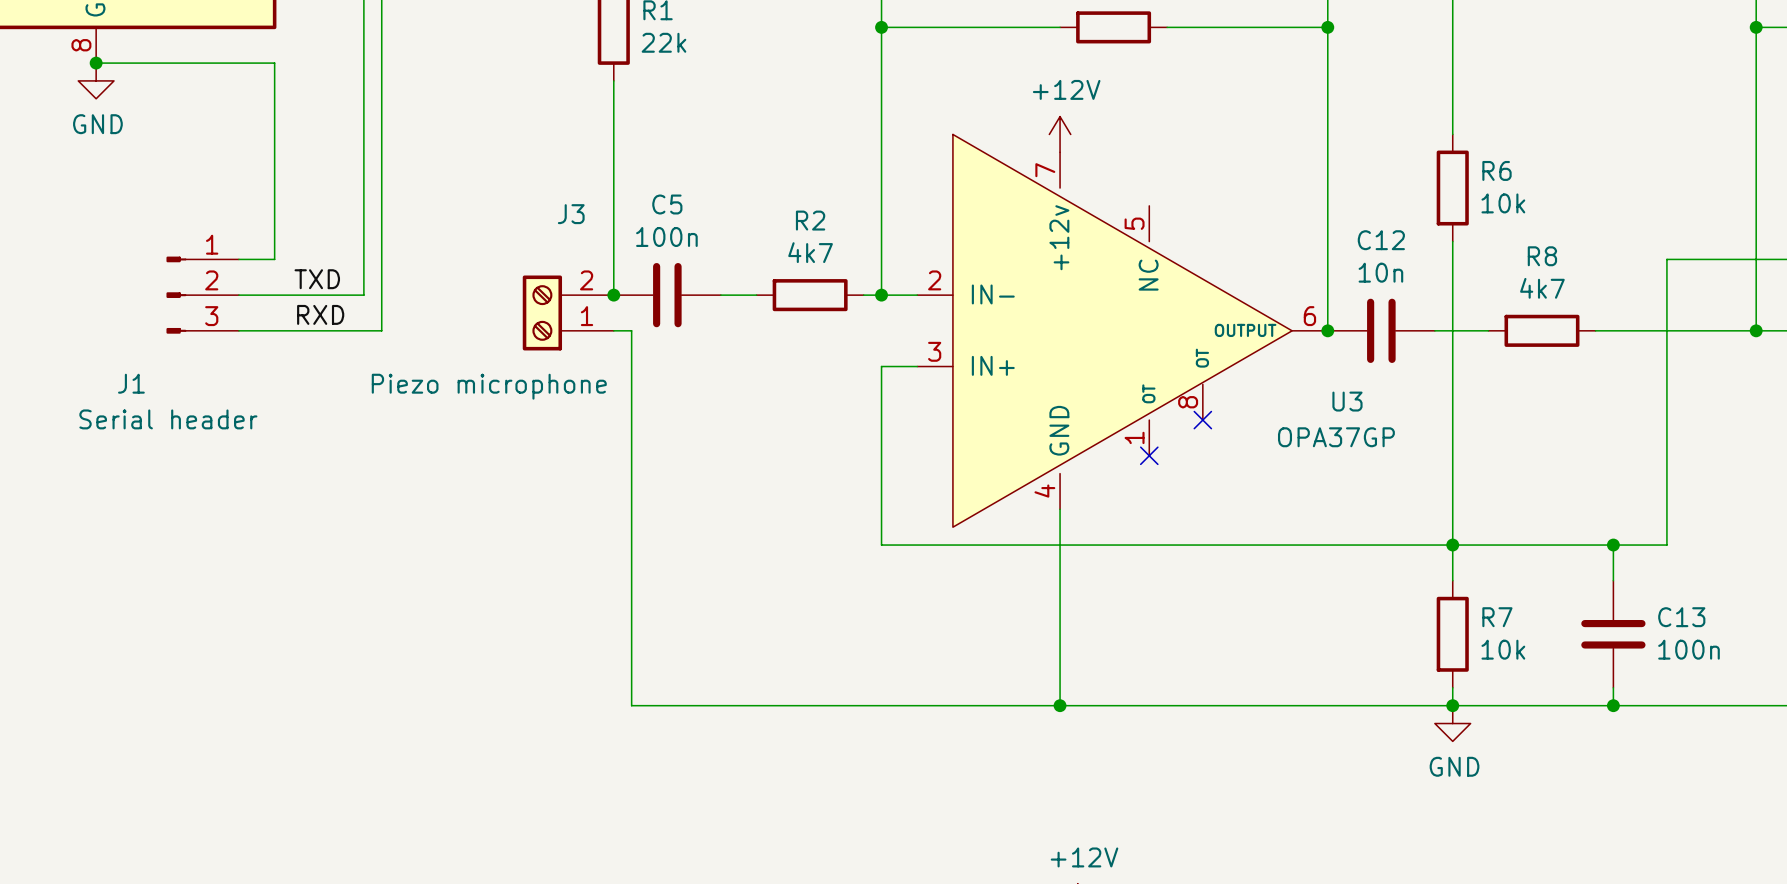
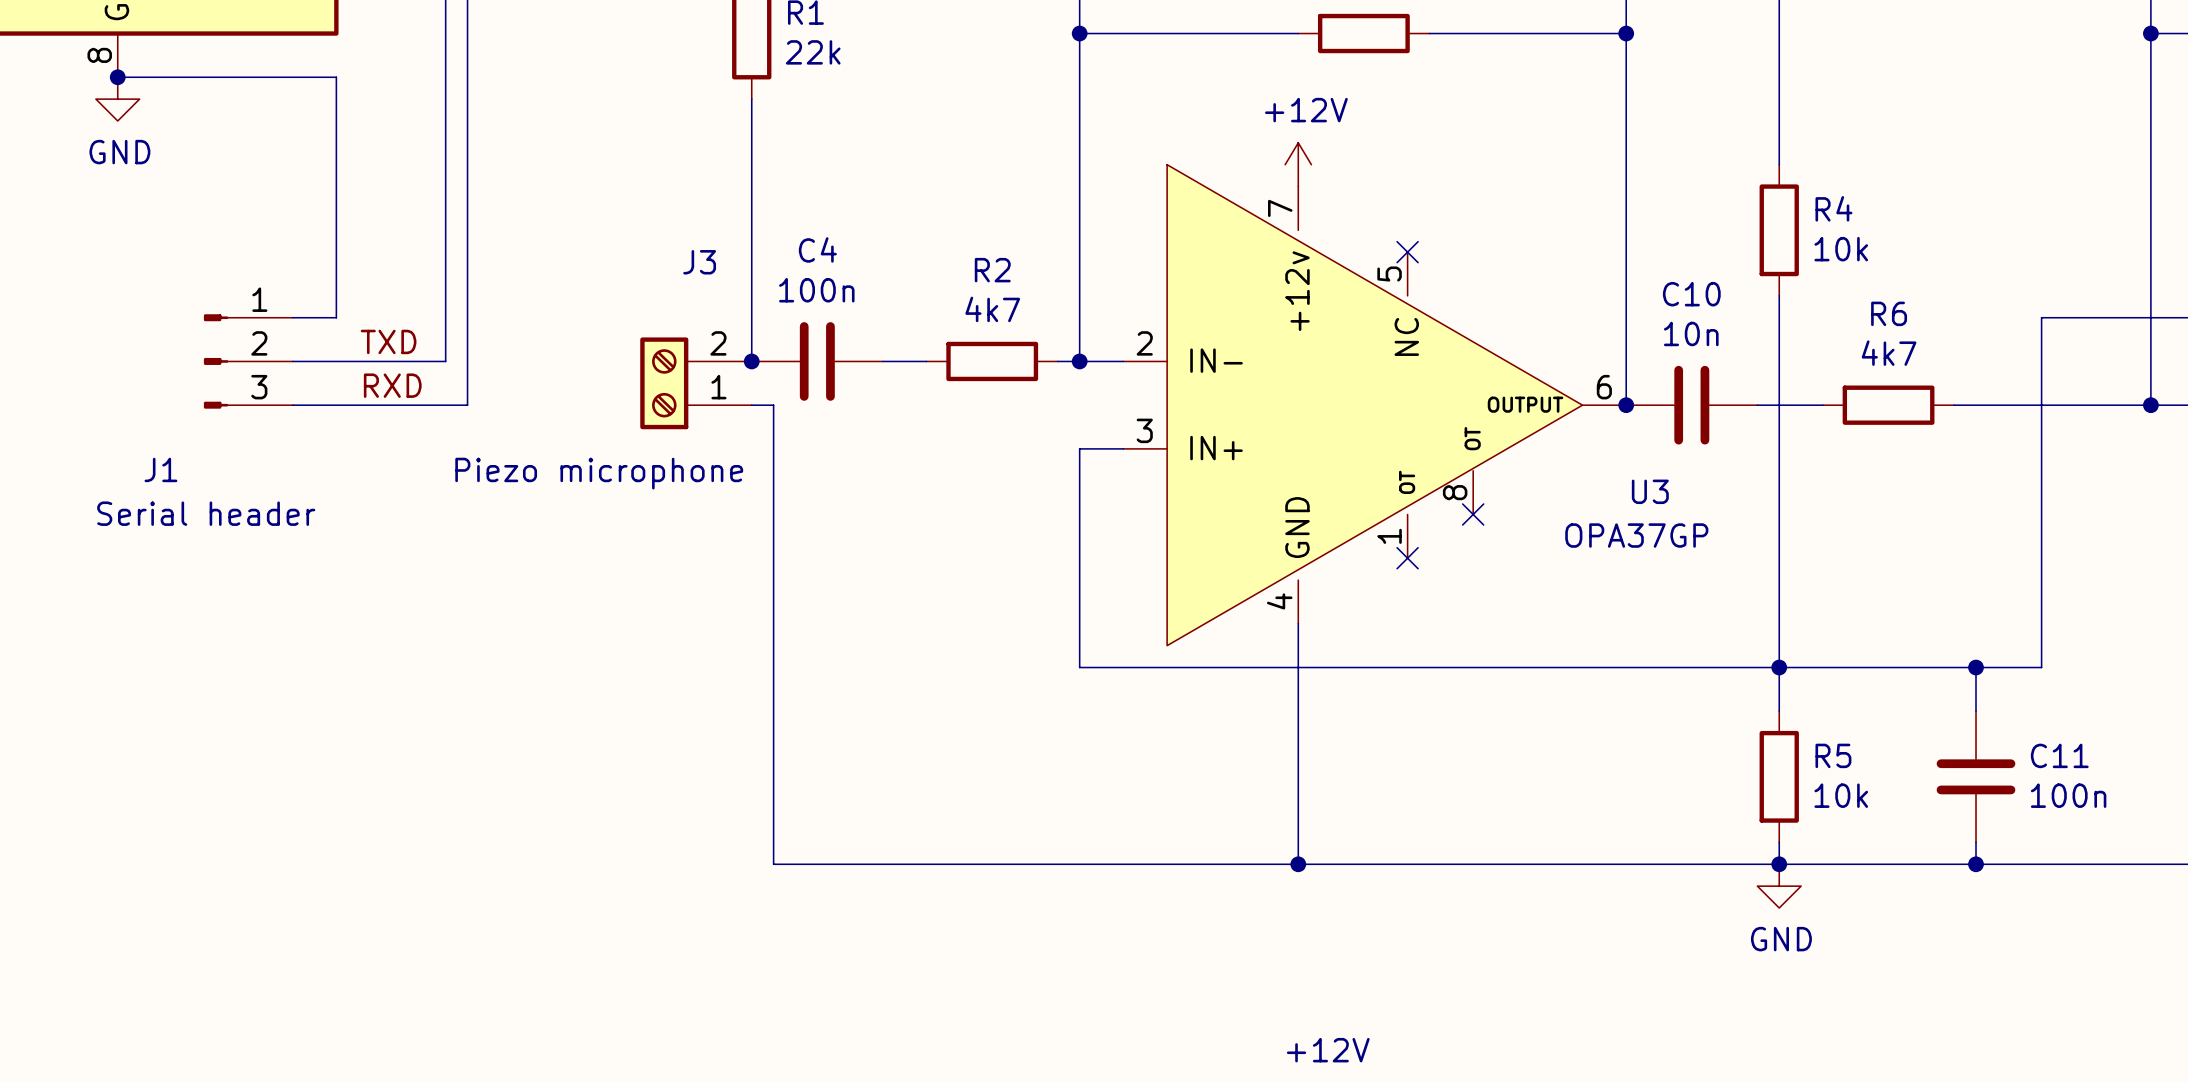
R6 name: R6 (1496, 170) -> R4 (1833, 208)
C5 name: C5 (667, 204) -> C4 (817, 249)
no-connect mark: none -> (1407, 252)
C12 name: C12 (1381, 240) -> C10 (1691, 294)
R8 name: R8 (1542, 256) -> R6 (1889, 313)
R7 name: R7 (1497, 617) -> R5 (1833, 755)
C13 name: C13 (1681, 617) -> C11 (2059, 755)

